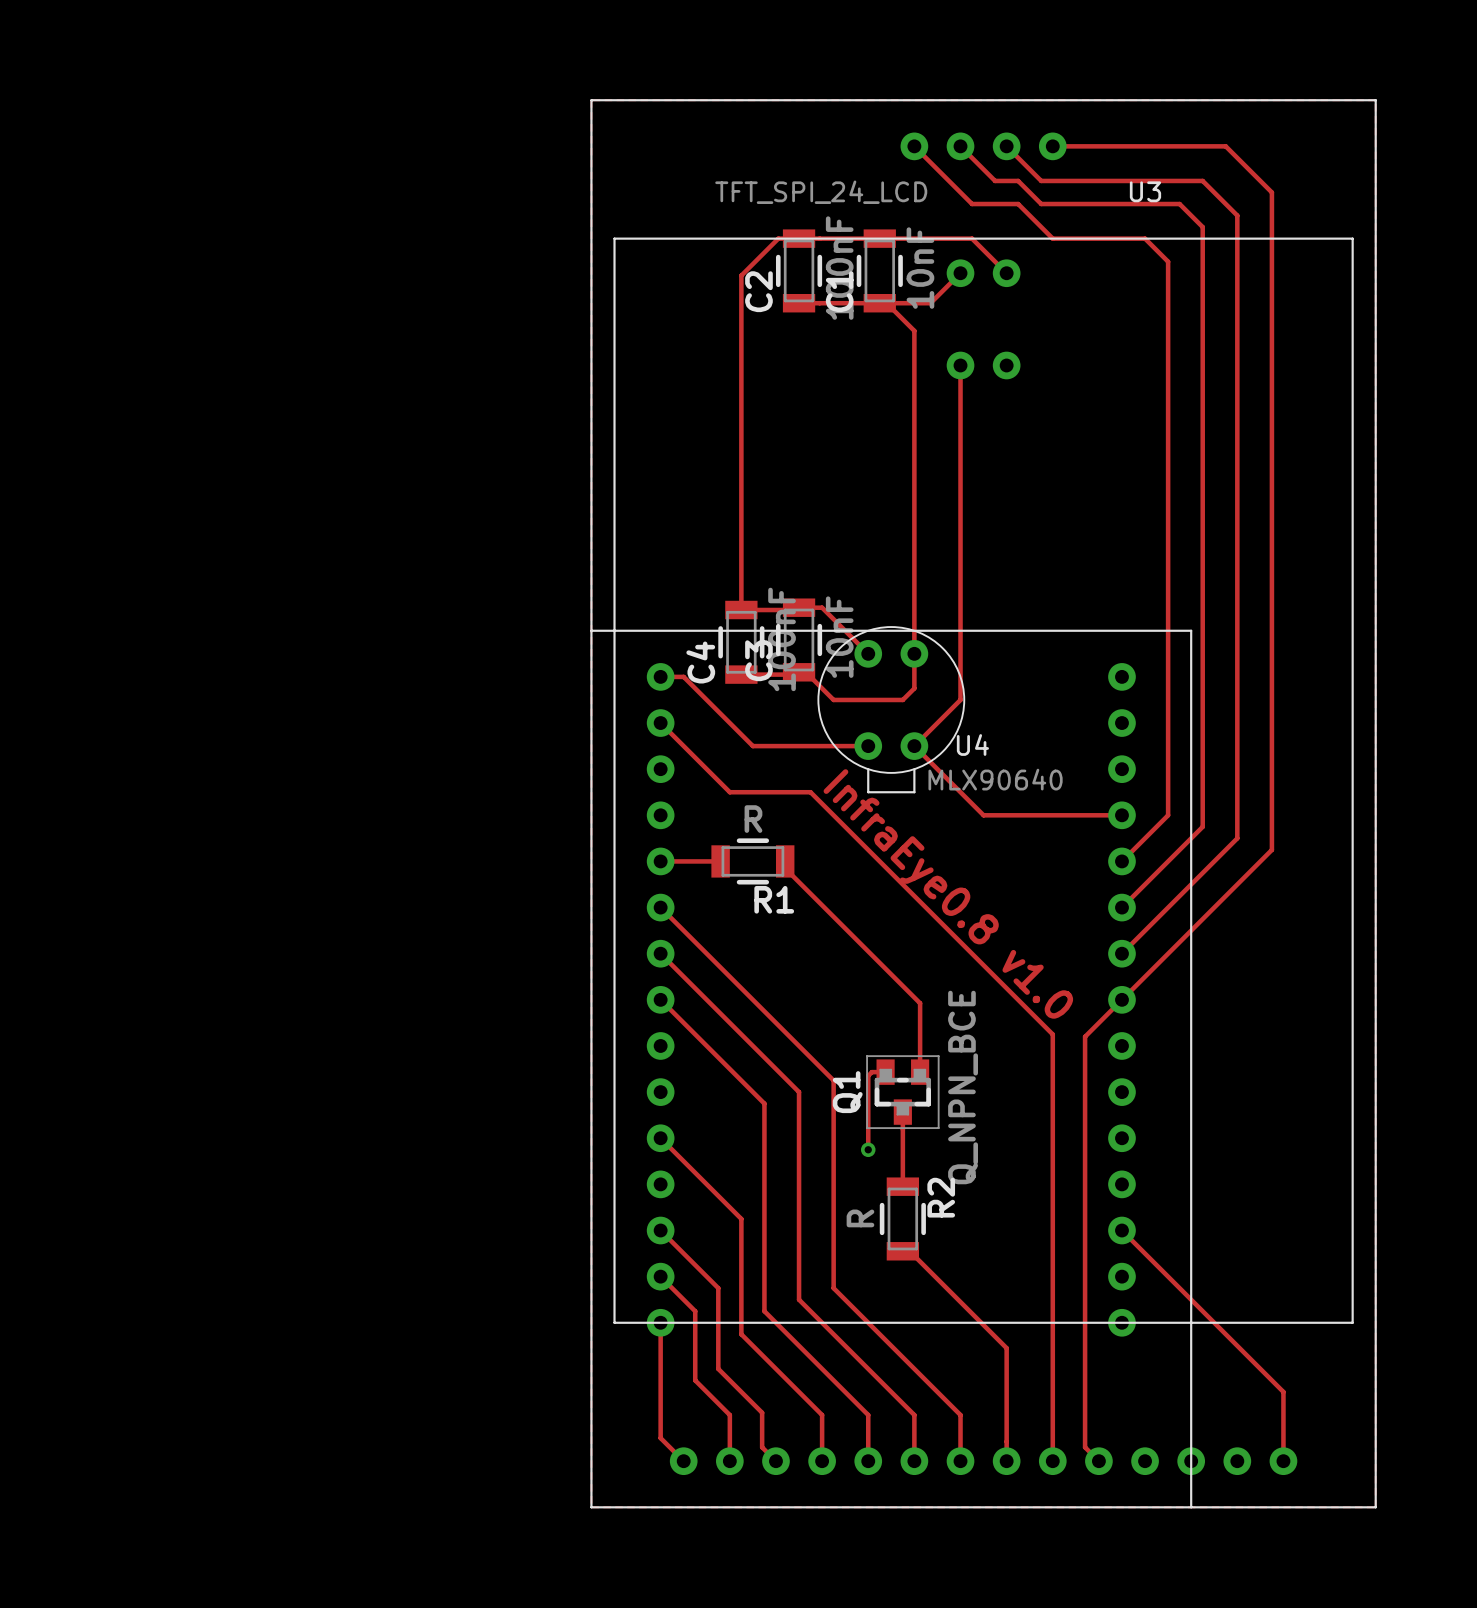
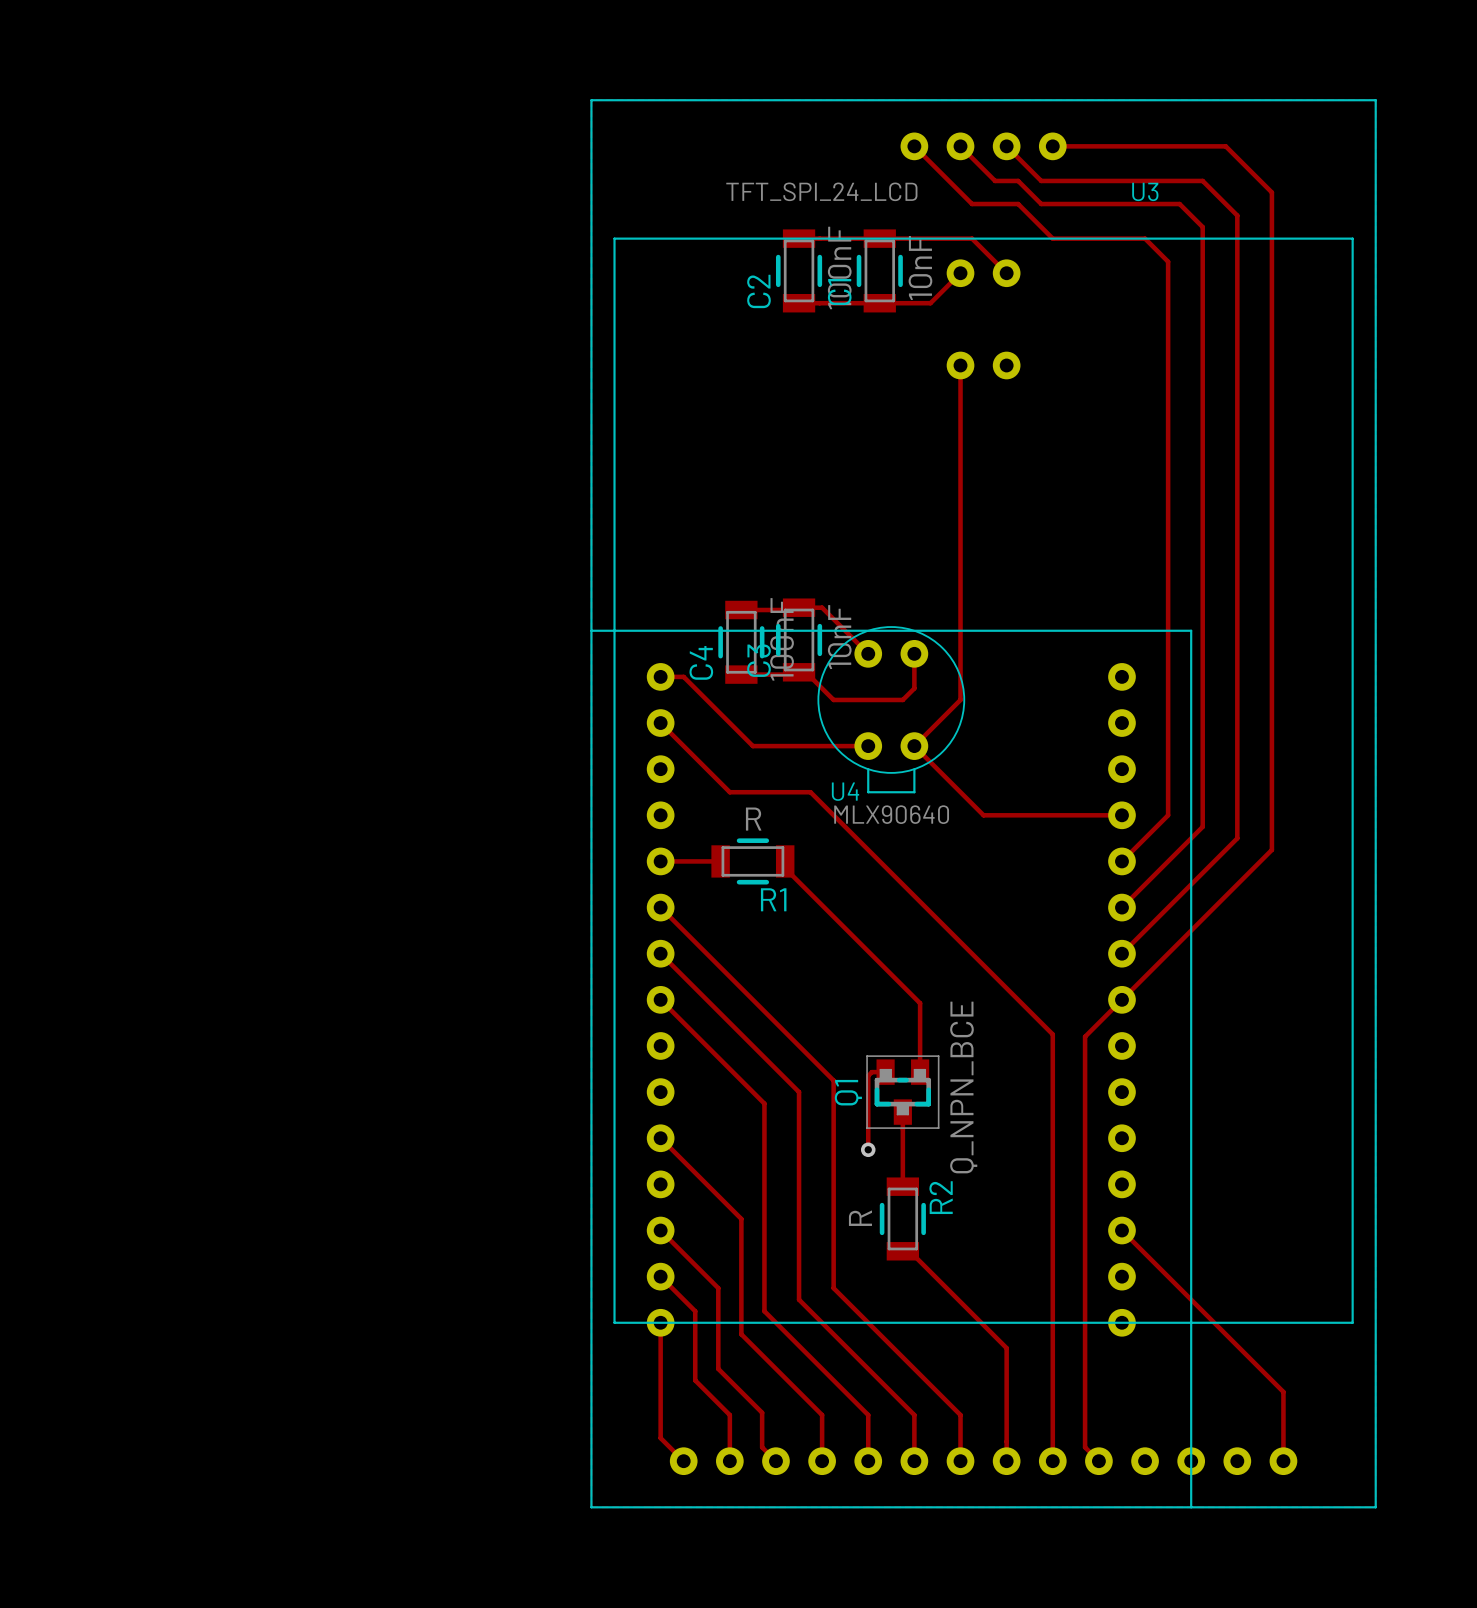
track: (799, 238) (778, 238) (741, 275) (741, 610) -> none
track: (886, 303) (914, 330) (914, 653) -> none
U4 name position: U4 (972, 744) -> U4 (845, 791)
U4 value position: MLX90640 (995, 779) -> MLX90640 (891, 814)
text: InfraEye0.8 v1.0 (948, 893) -> none

